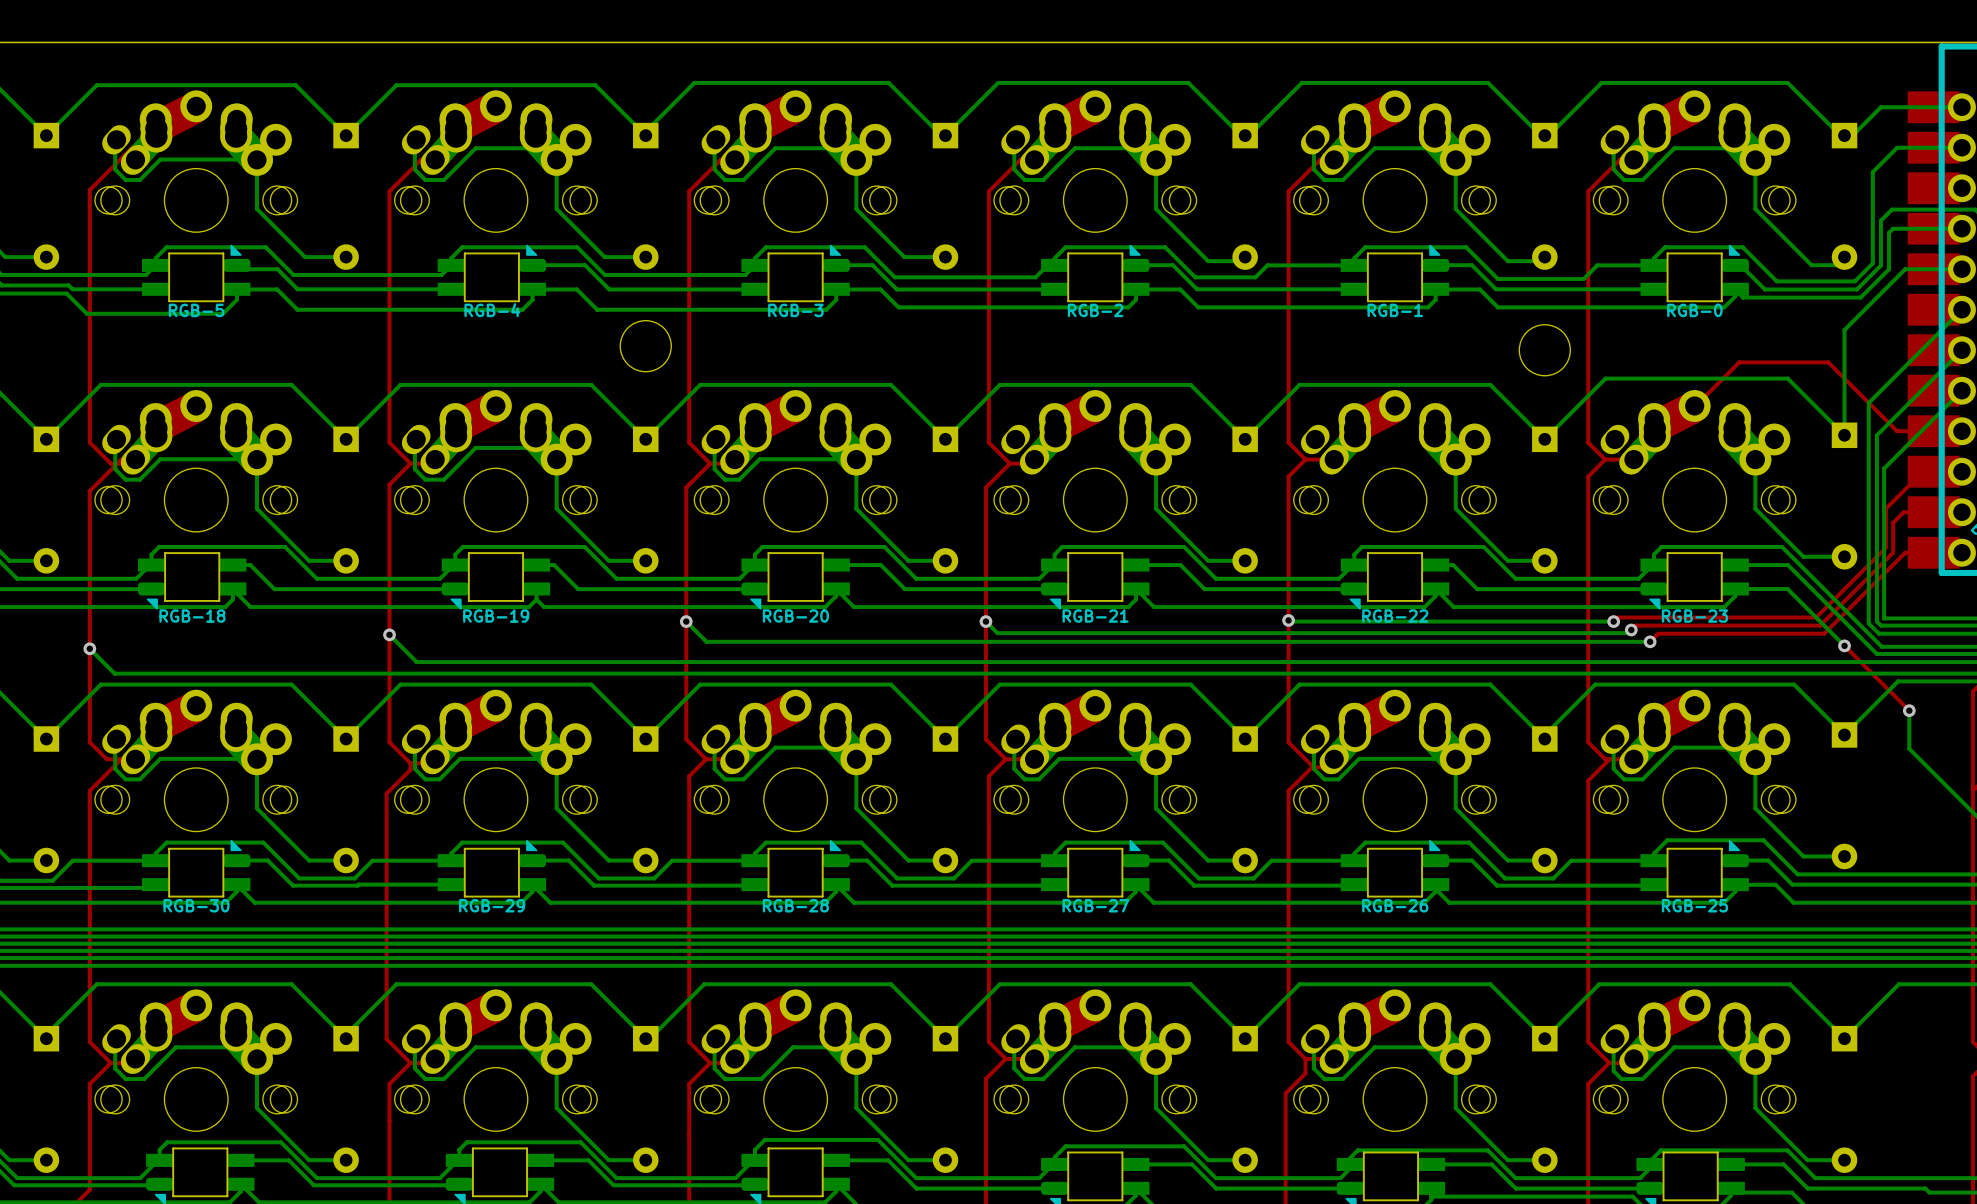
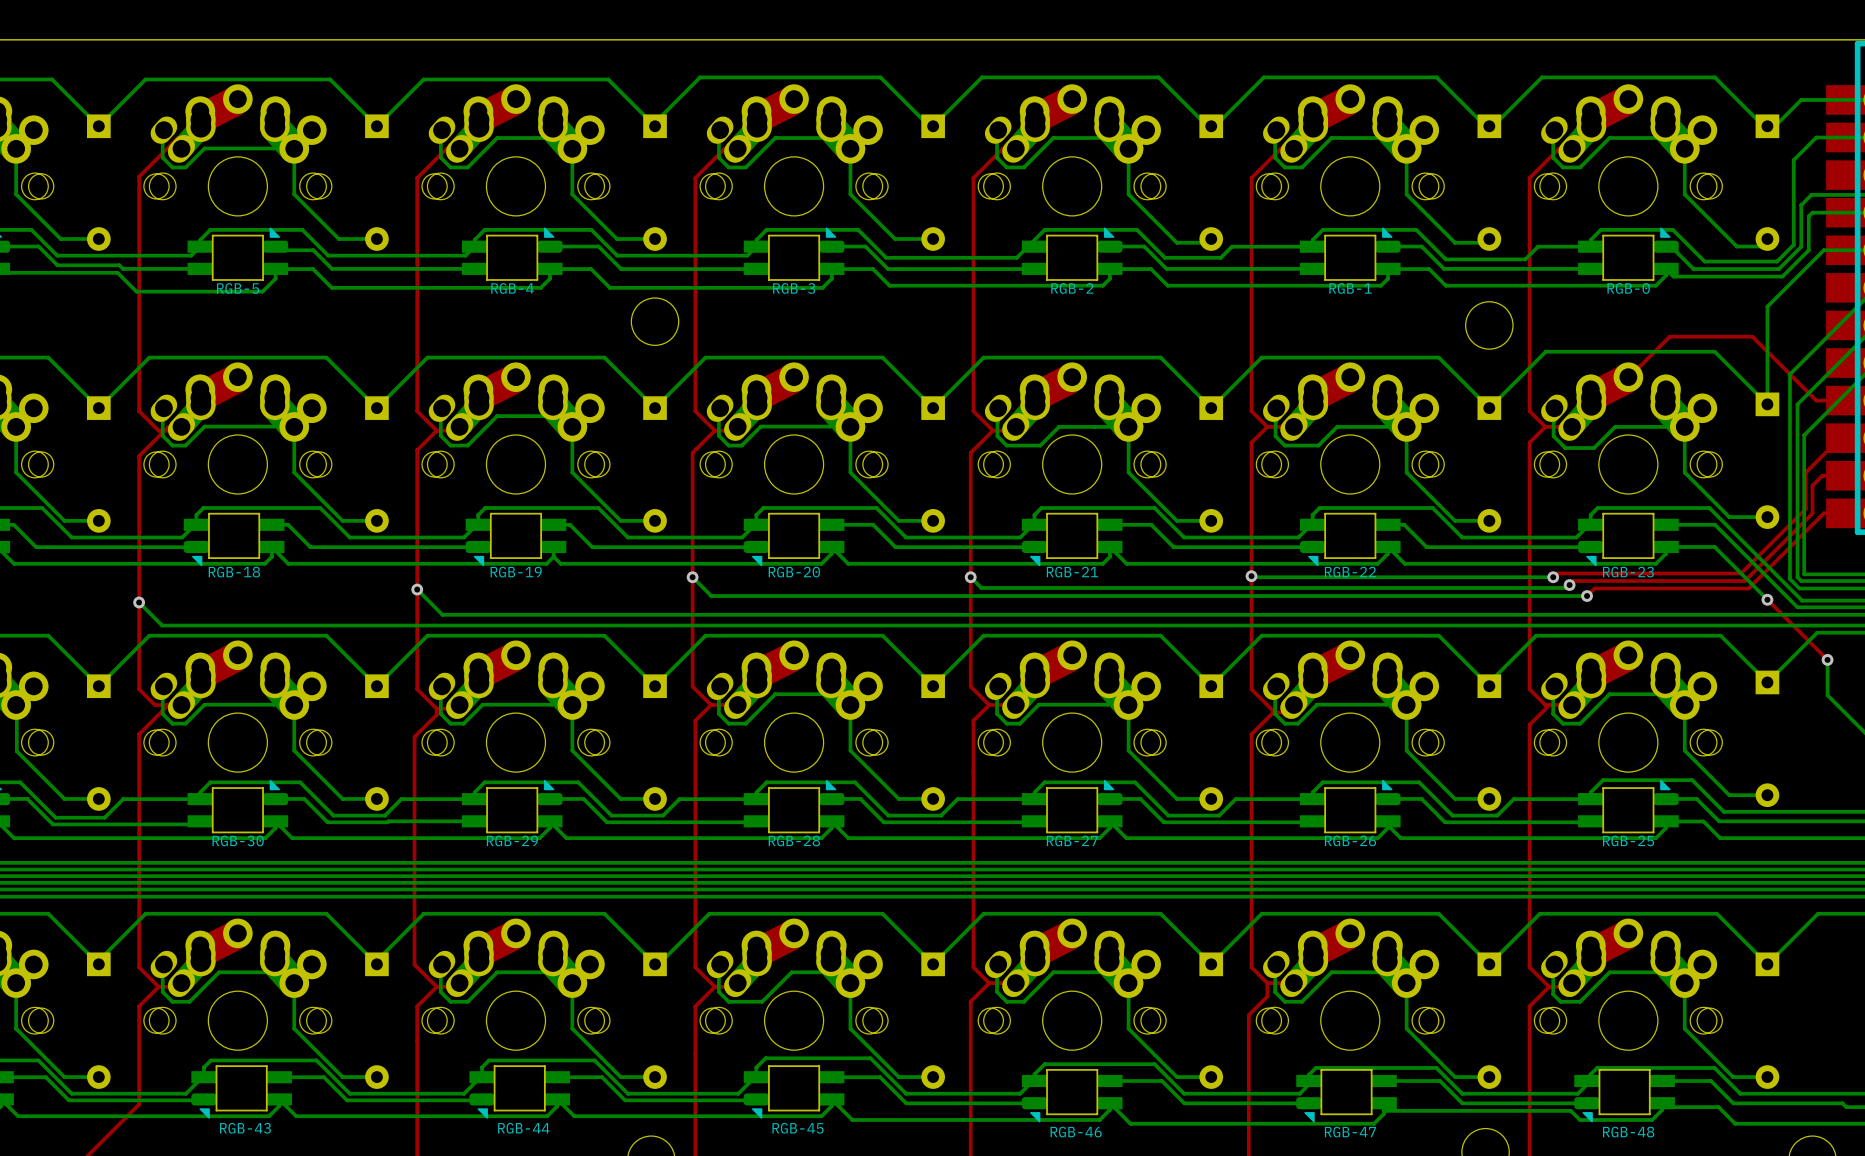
bottom track: none -> (998, 408) (997, 436) (1006, 445) (1040, 445) (1058, 426) (1128, 426)
bottom track: none -> (1276, 408) (1275, 436) (1284, 445) (1318, 445) (1337, 426) (1406, 426)
bottom track: none -> (1554, 408) (1553, 436) (1565, 448) (1594, 448) (1615, 426) (1684, 426)

